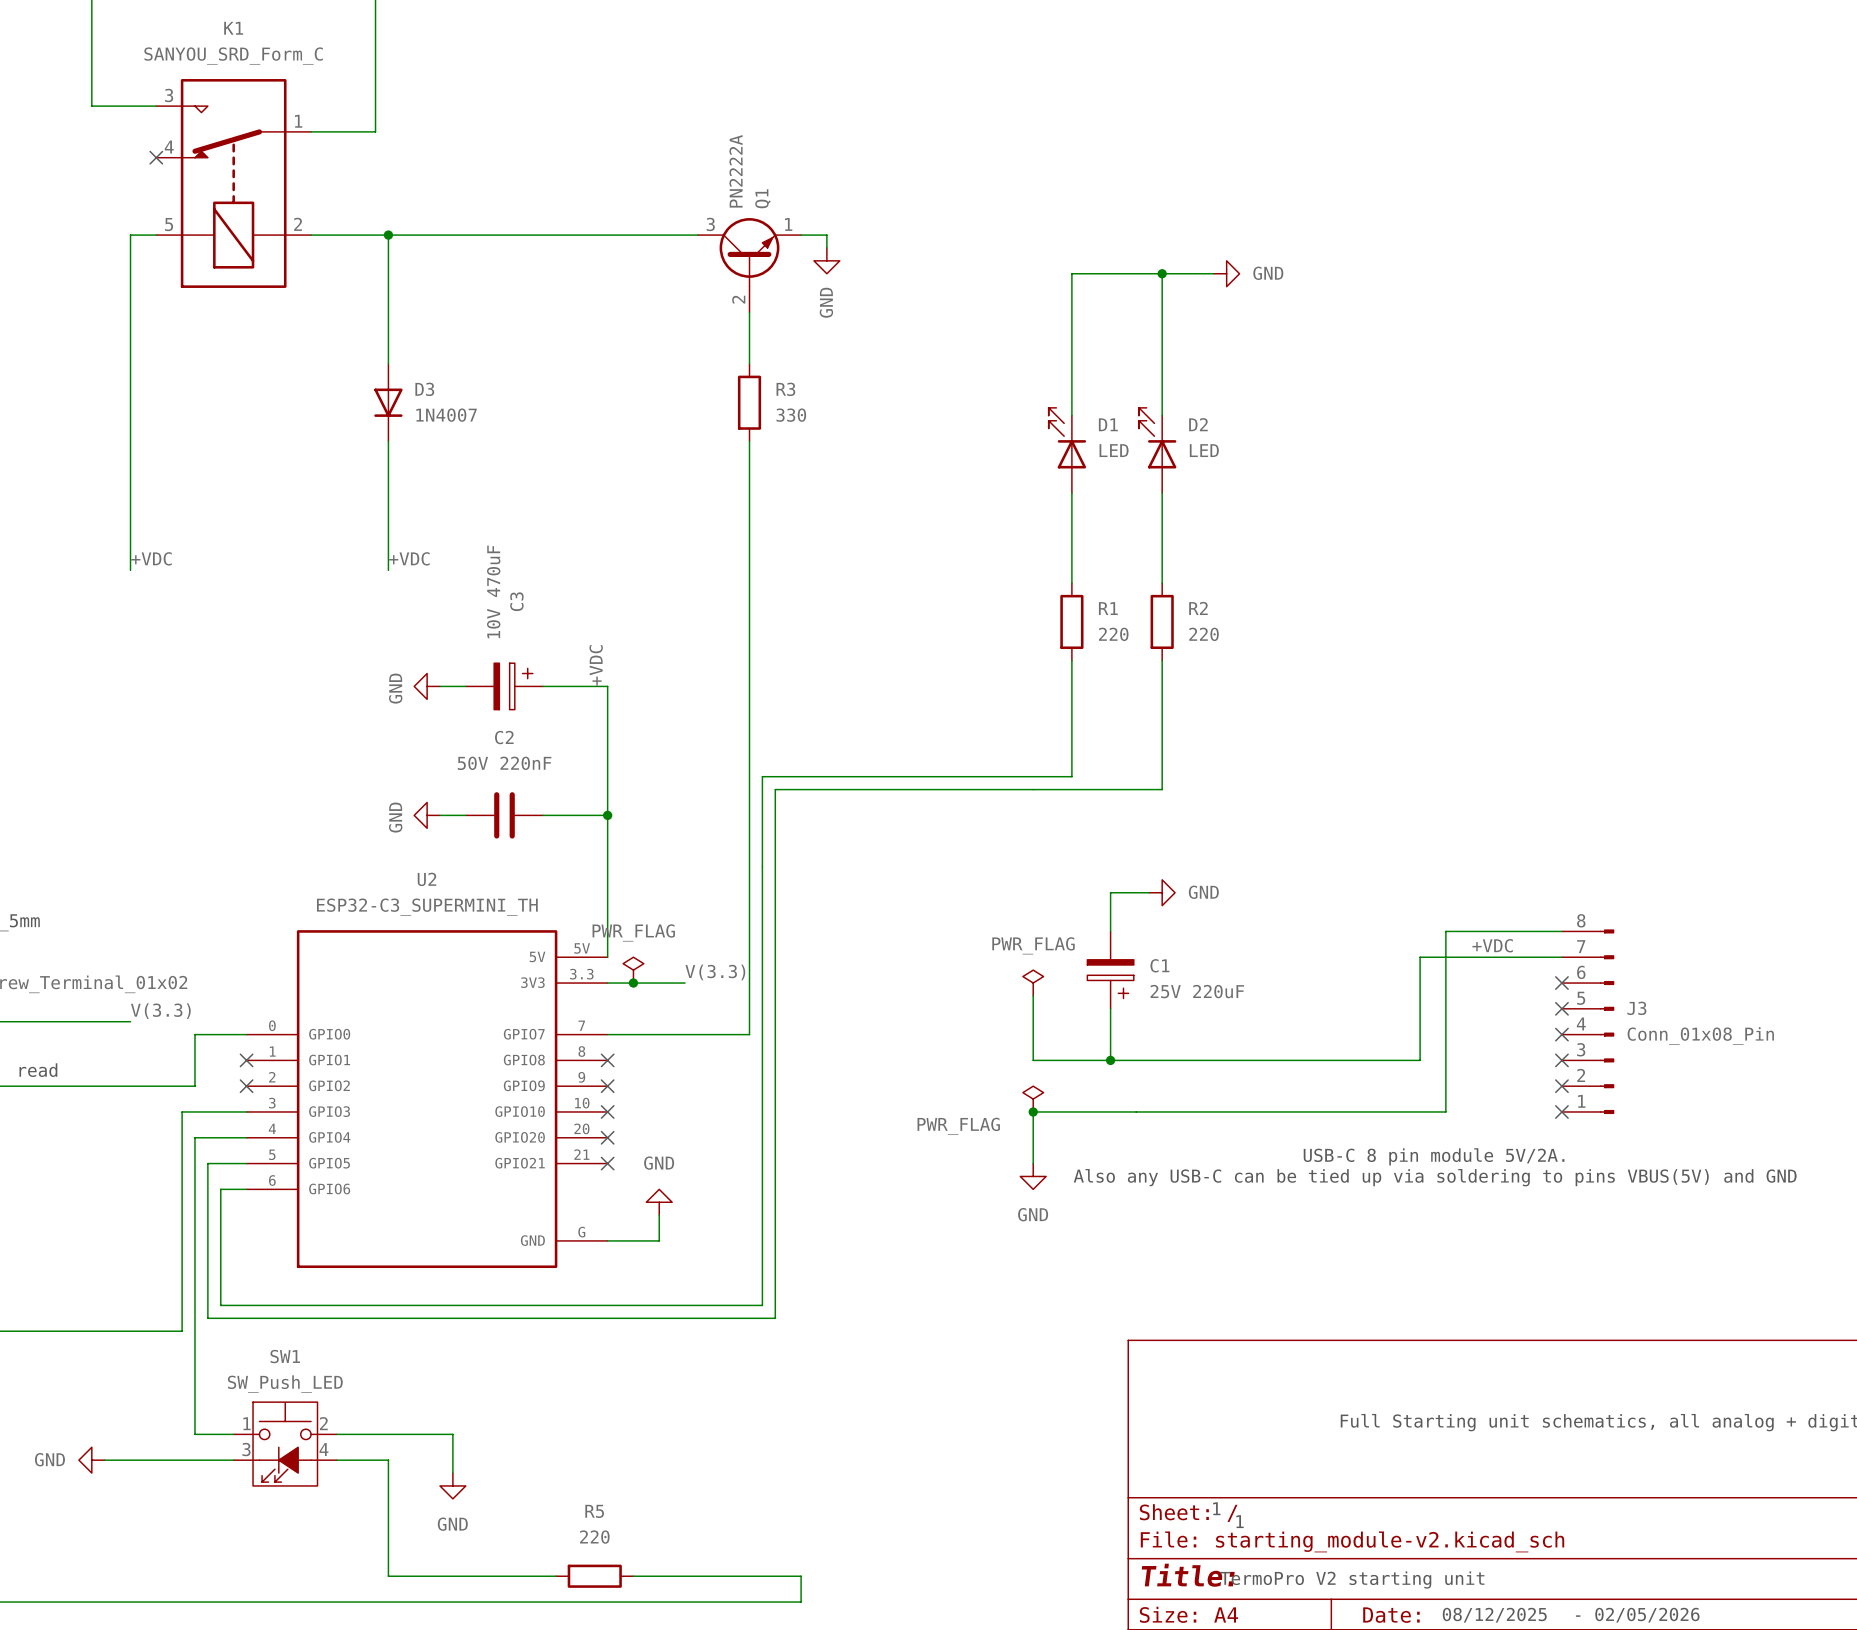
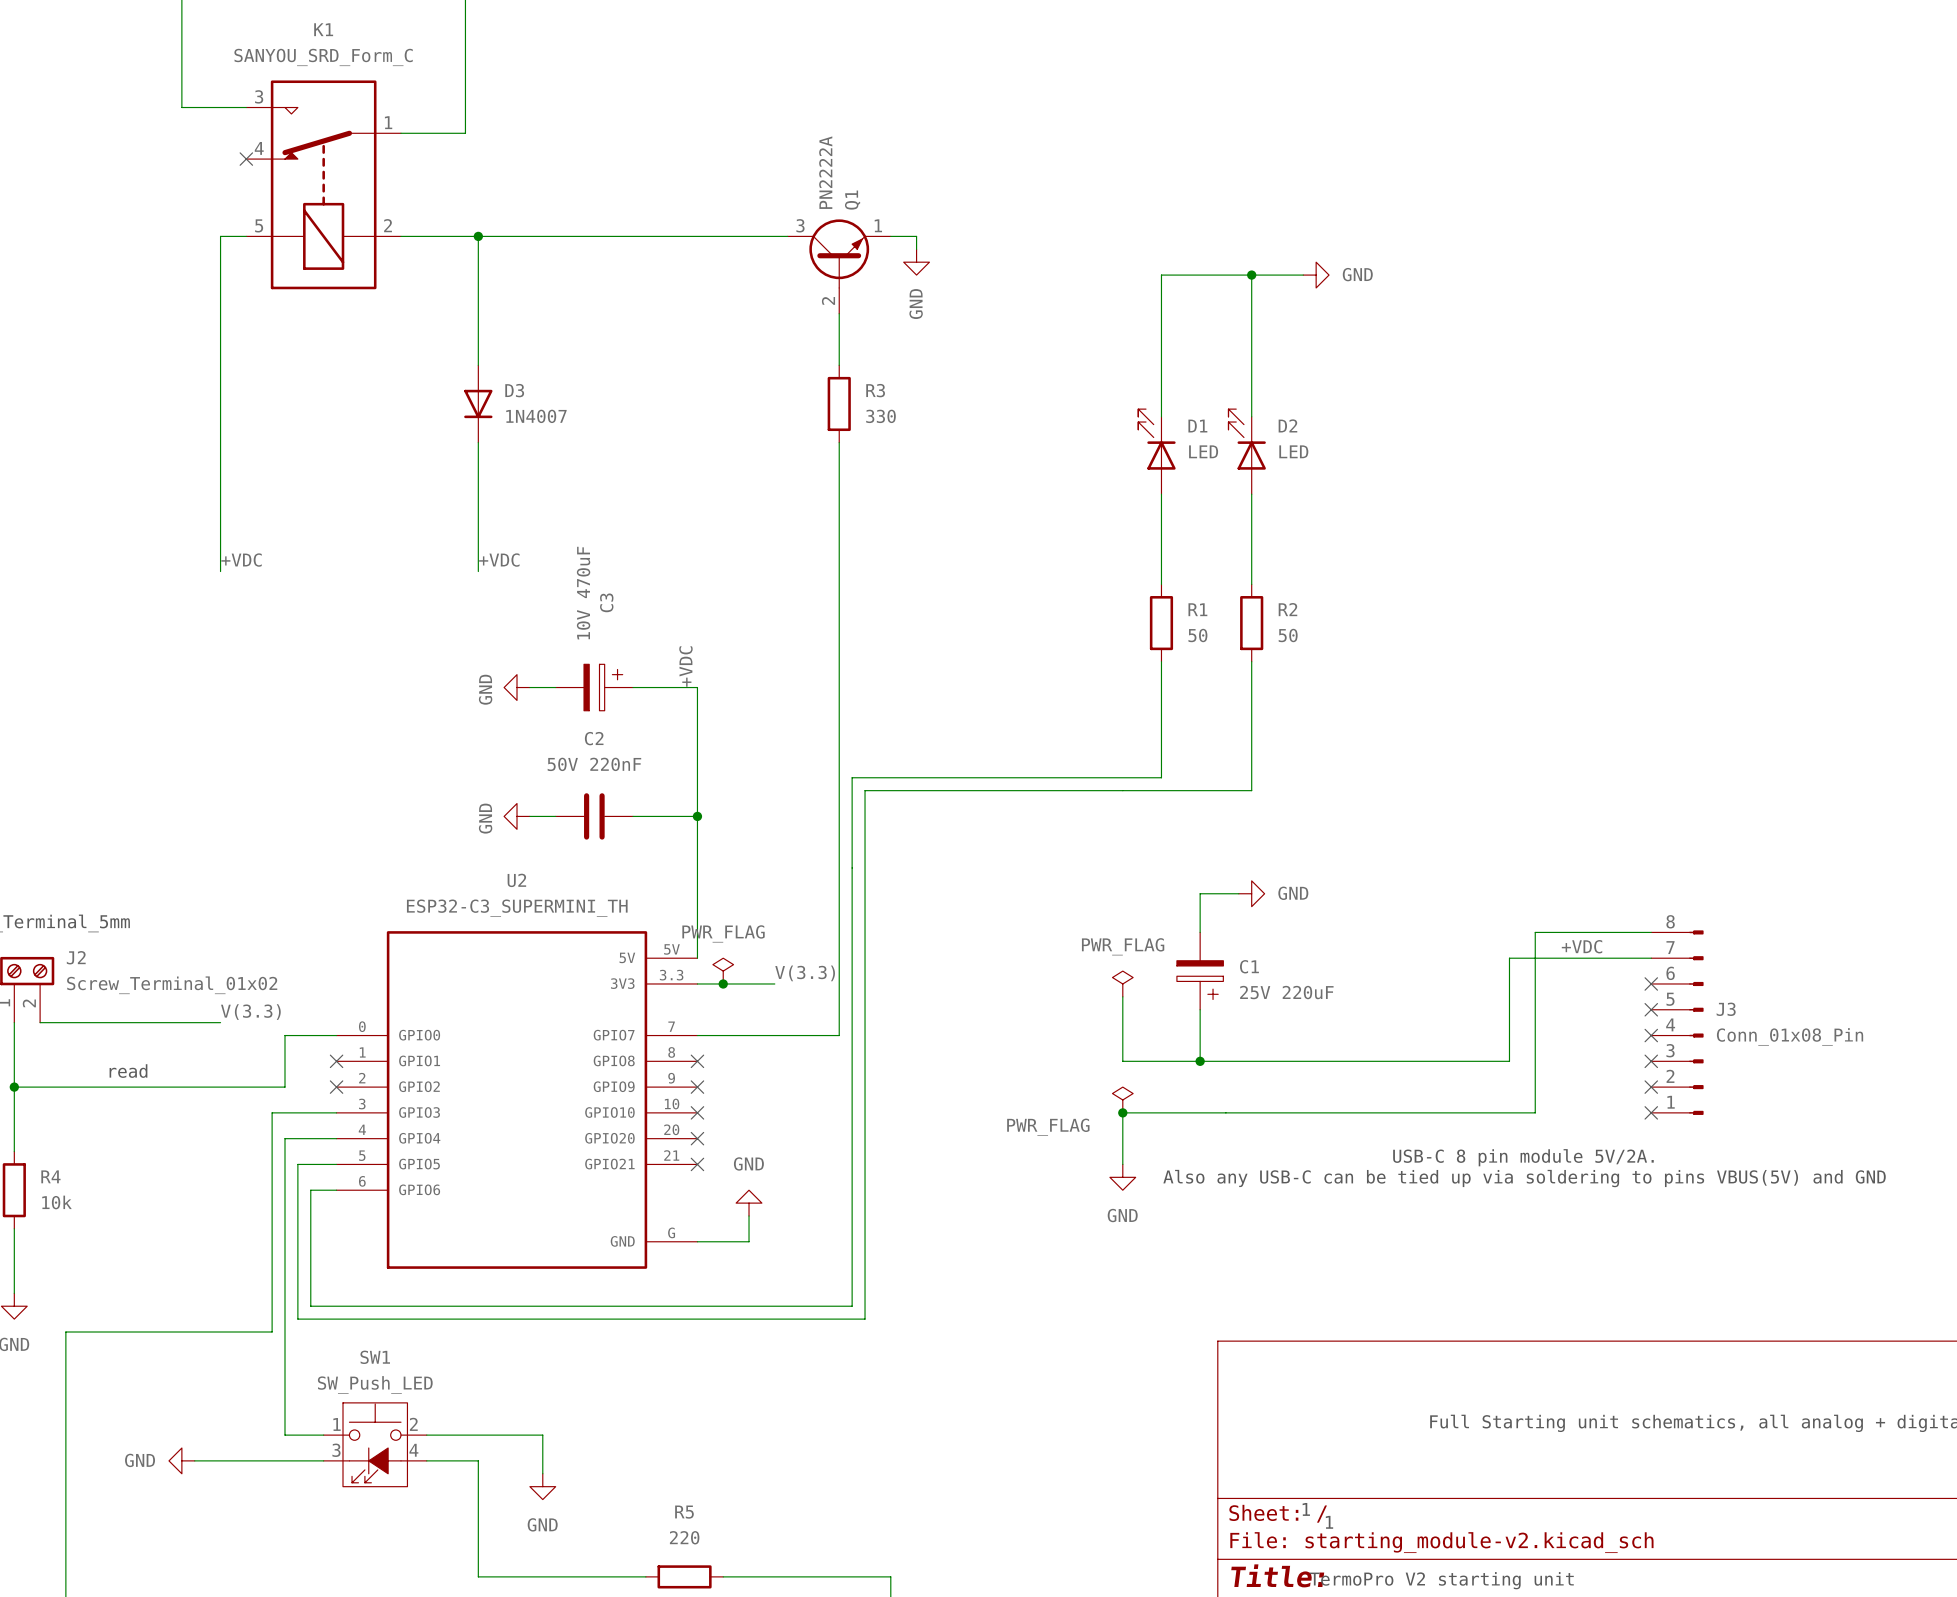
R1 value: 220 (1113, 634) -> 50 (1197, 635)
R2 value: 220 (1204, 634) -> 50 (1288, 635)

